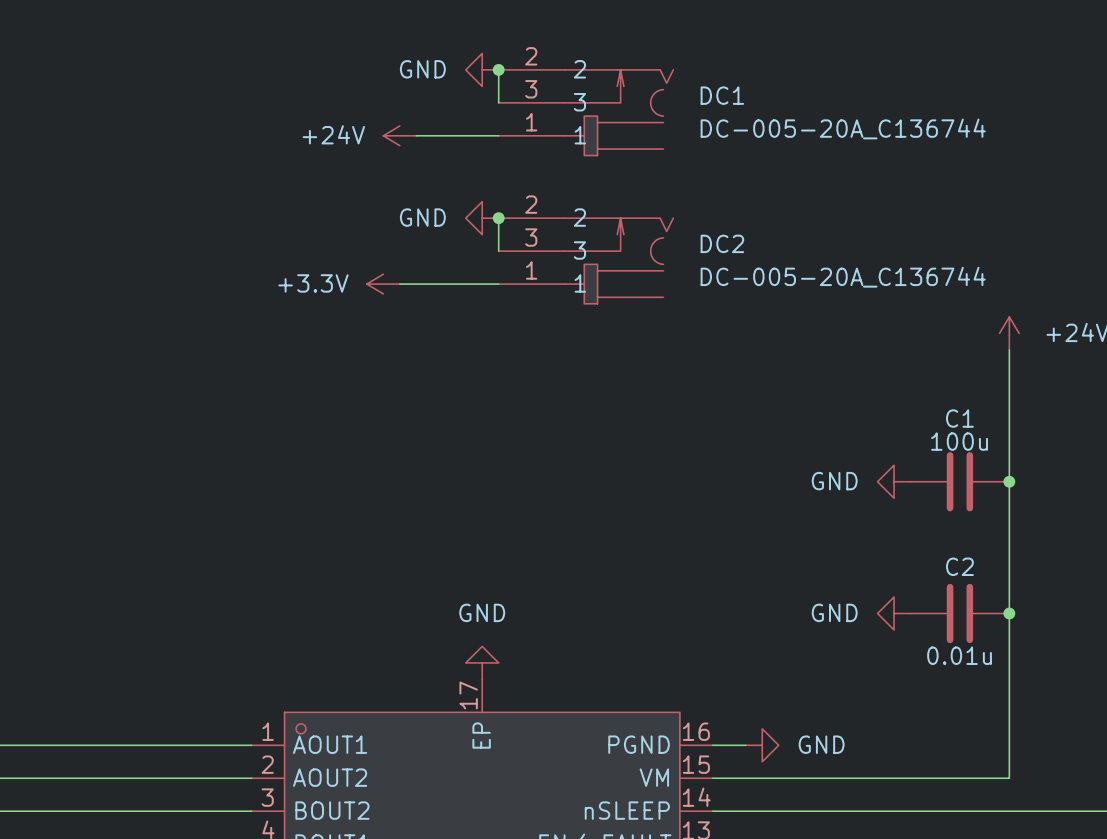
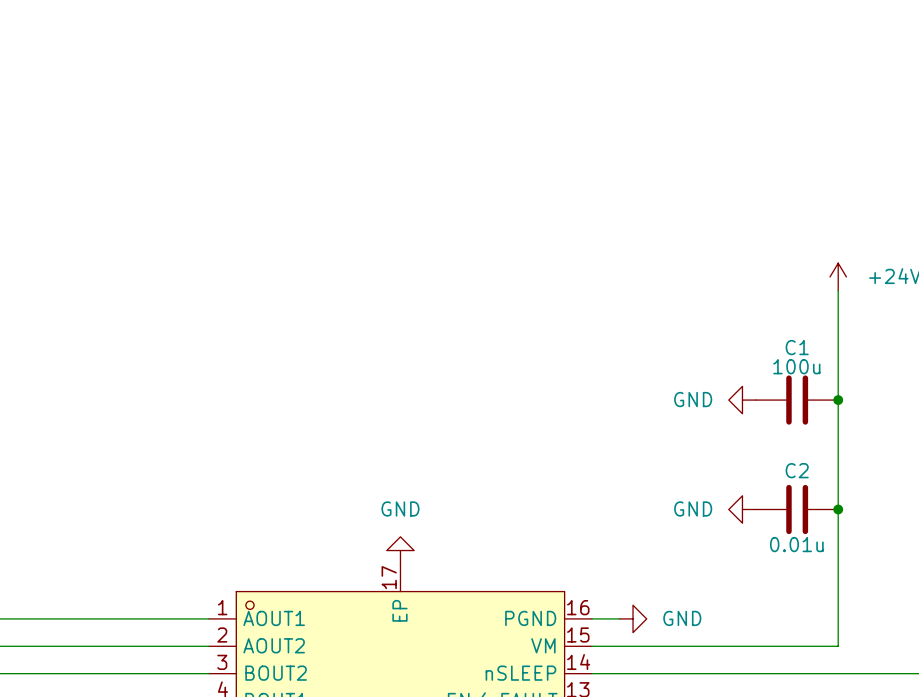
power symbol: GND (482, 69) -> none
wire: (498, 69) (498, 102) -> none
junction: (498, 69) -> none
DC1: DC-005-20A_C136744 (585, 112) -> none
power symbol: +24V (399, 135) -> none
wire: (416, 135) (498, 135) -> none
power symbol: GND (482, 218) -> none
wire: (498, 218) (498, 251) -> none
junction: (498, 218) -> none
DC2: DC-005-20A_C136744 (585, 260) -> none
power symbol: +3.3V (383, 284) -> none
wire: (399, 284) (498, 284) -> none

